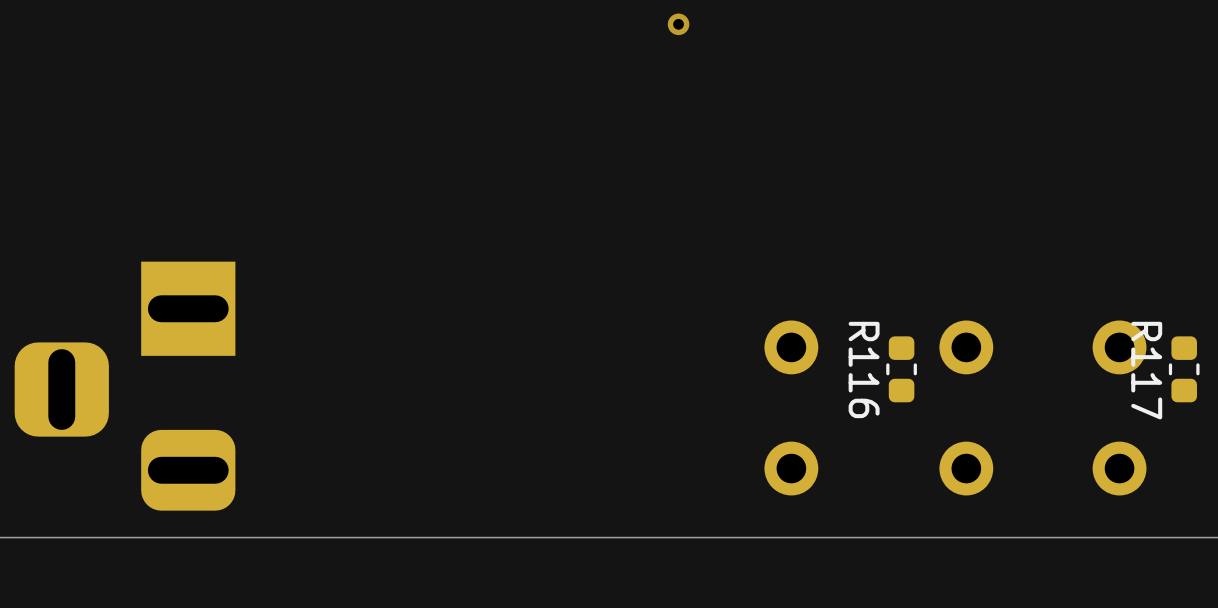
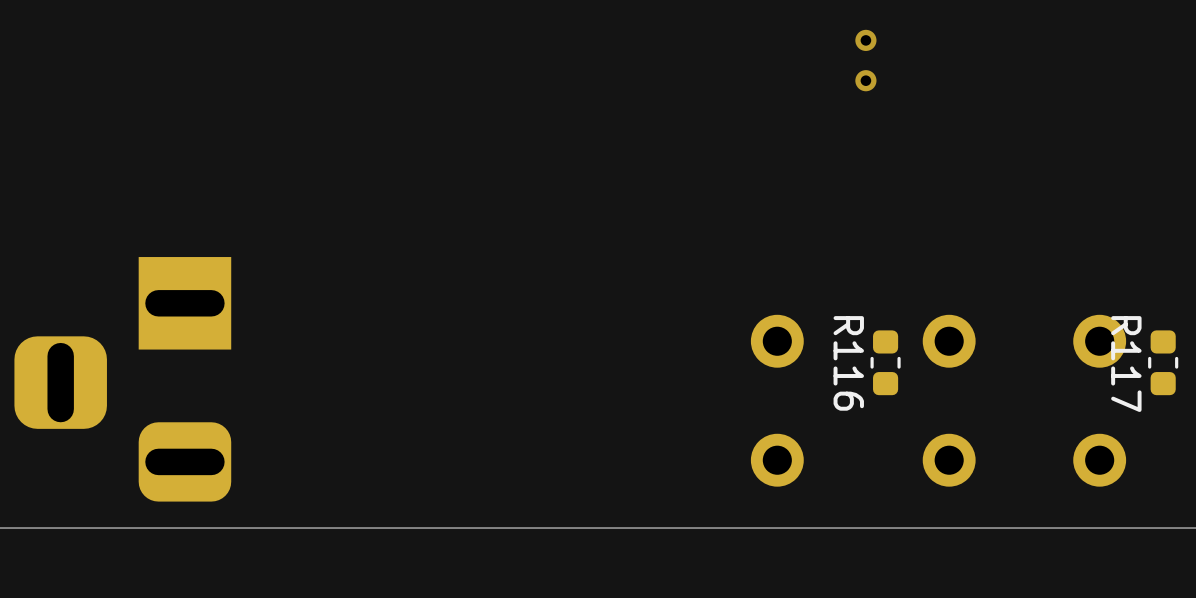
via: (678, 24) -> none
via: none -> (865, 40)
via: none -> (865, 80)

